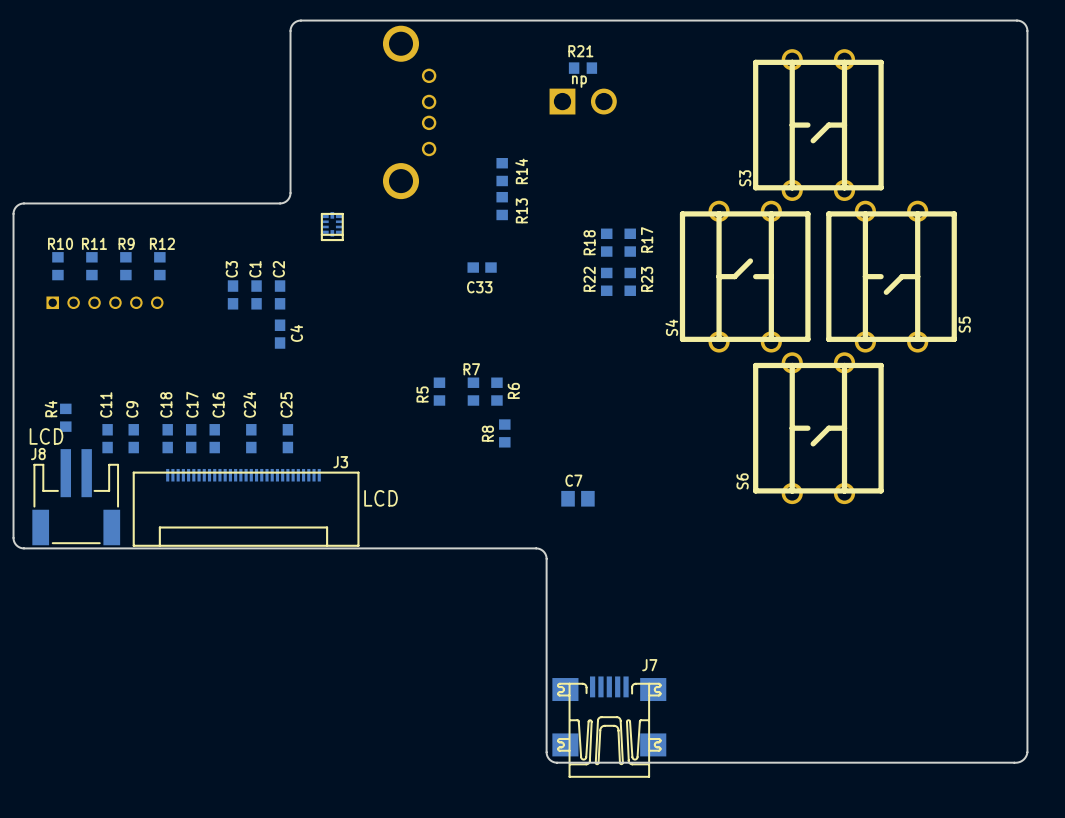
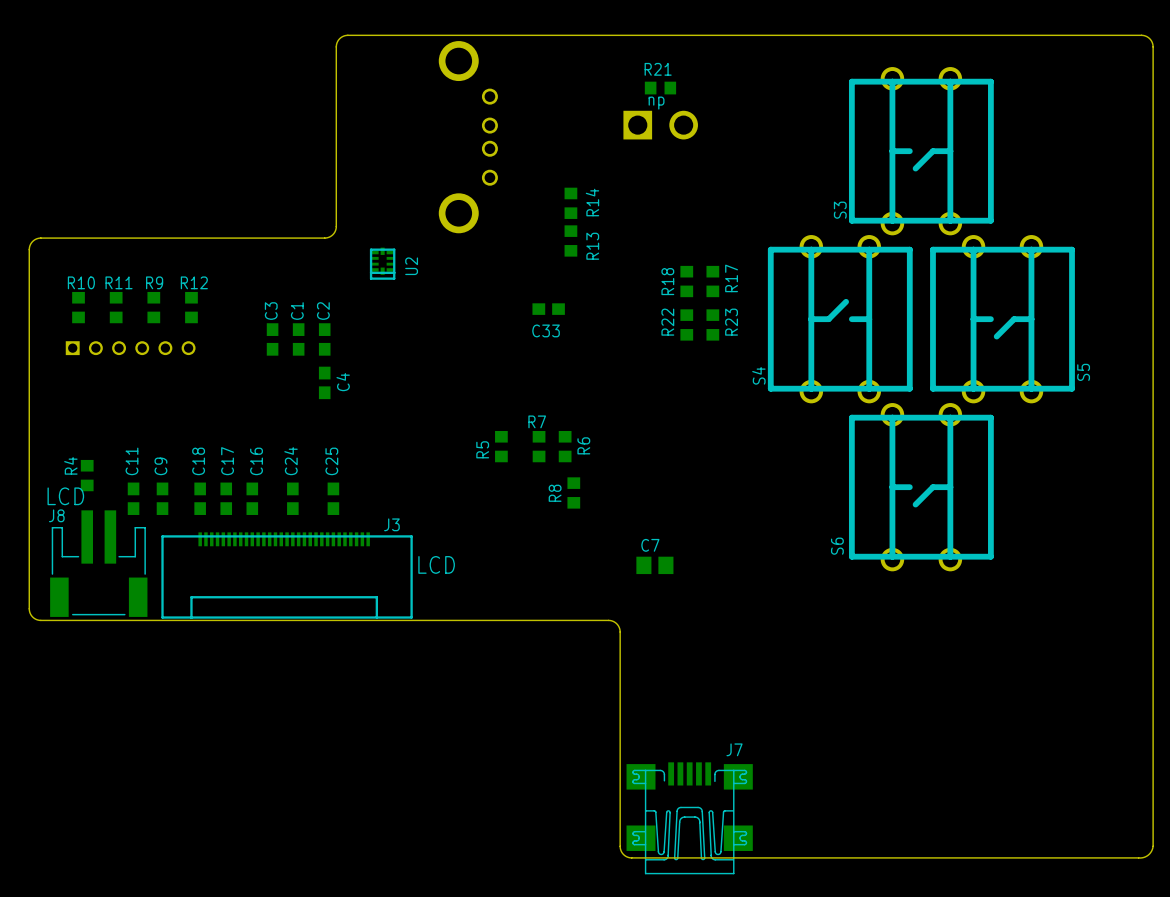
text: none -> U2 (411, 266)

